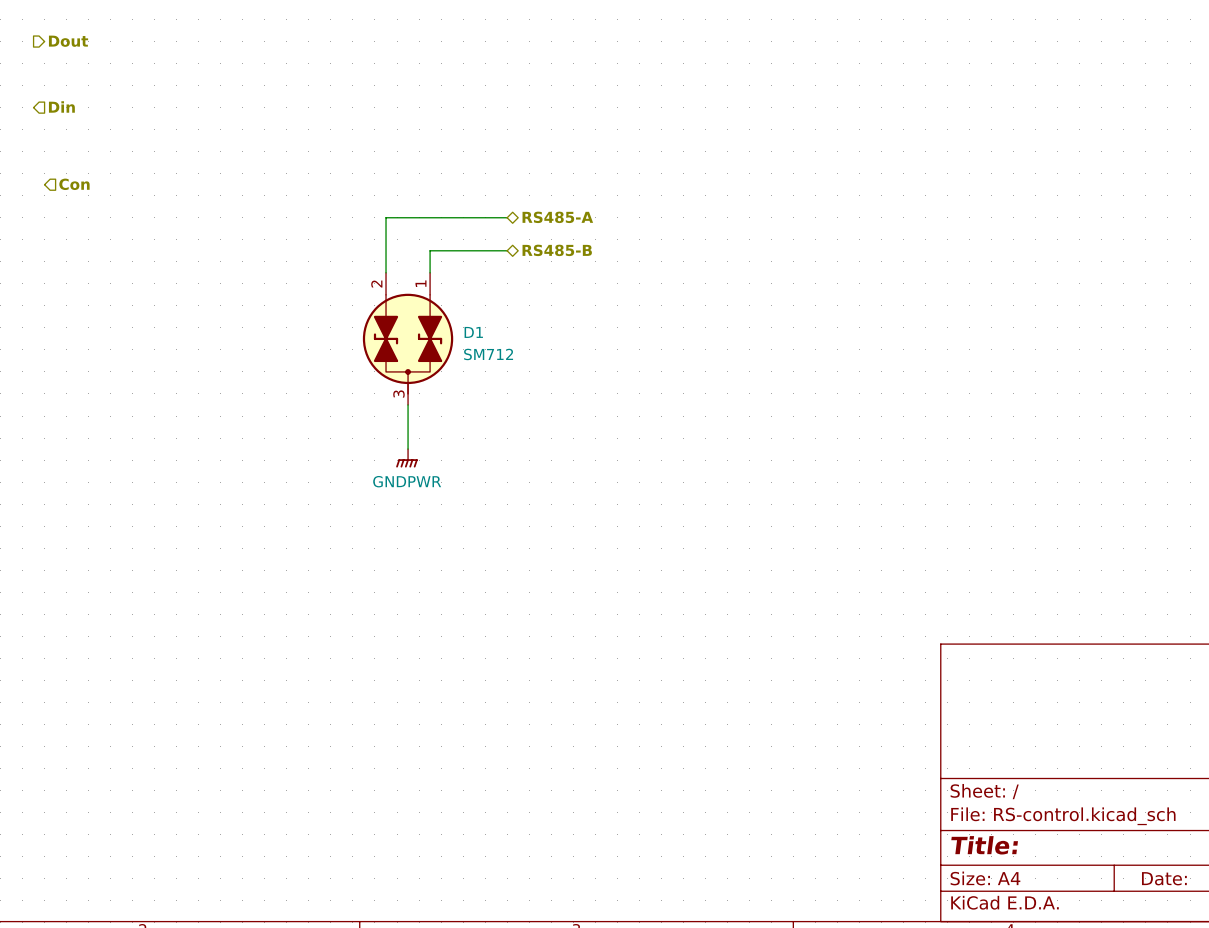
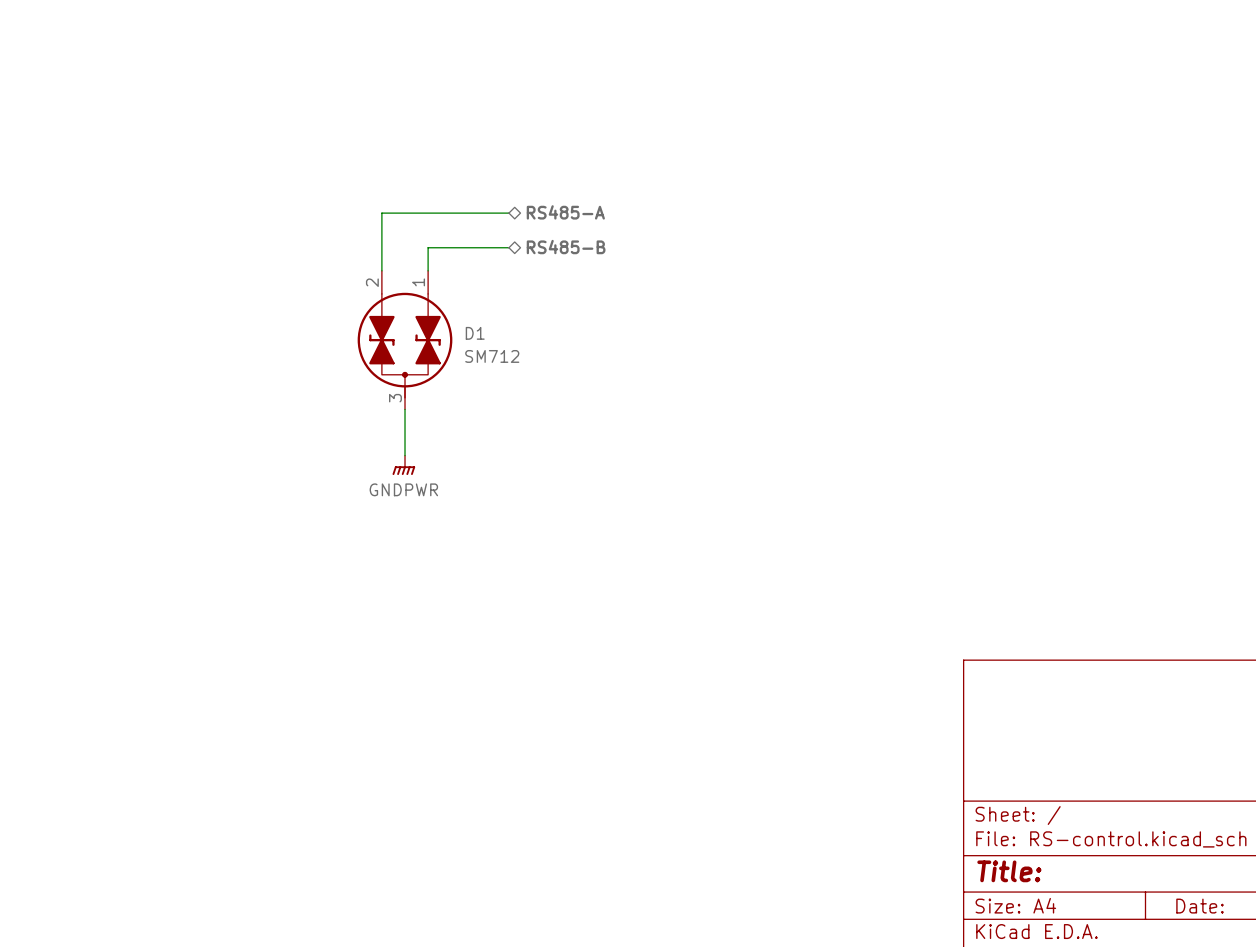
hierarchical label: Dout (68, 41) -> none
hierarchical label: Din (61, 106) -> none
hierarchical label: Con (74, 184) -> none

